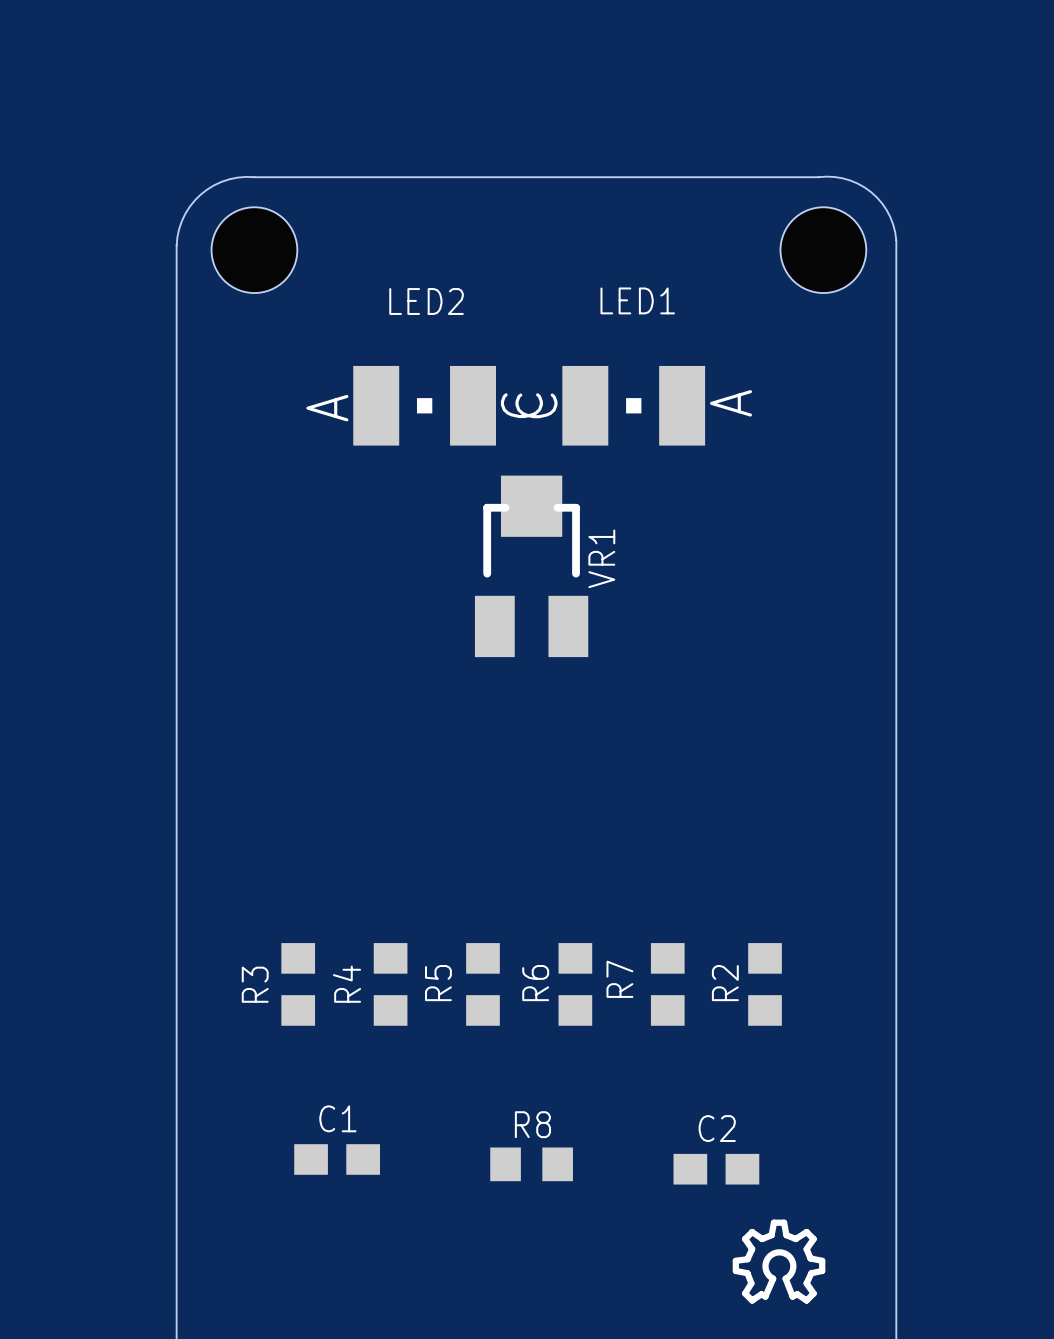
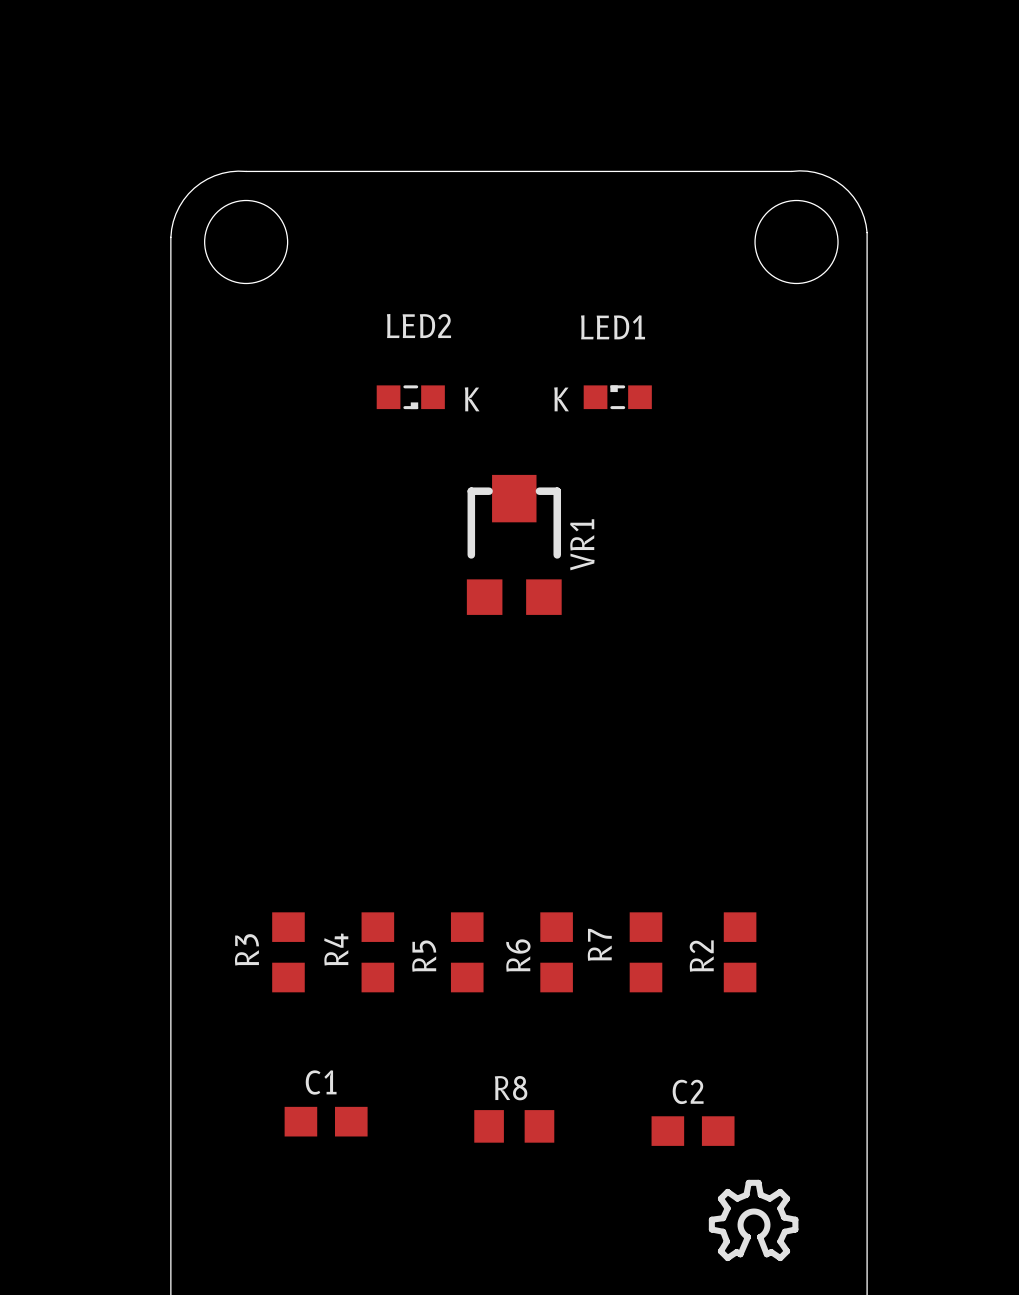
LED2 footprint: [353, 365, 497, 446] -> [376, 385, 445, 410]
LED1 footprint: [562, 365, 706, 446] -> [583, 385, 652, 410]
text: none -> K (472, 399)
text: none -> K (561, 399)
VR1 footprint: [474, 475, 589, 658] -> [466, 474, 562, 615]

